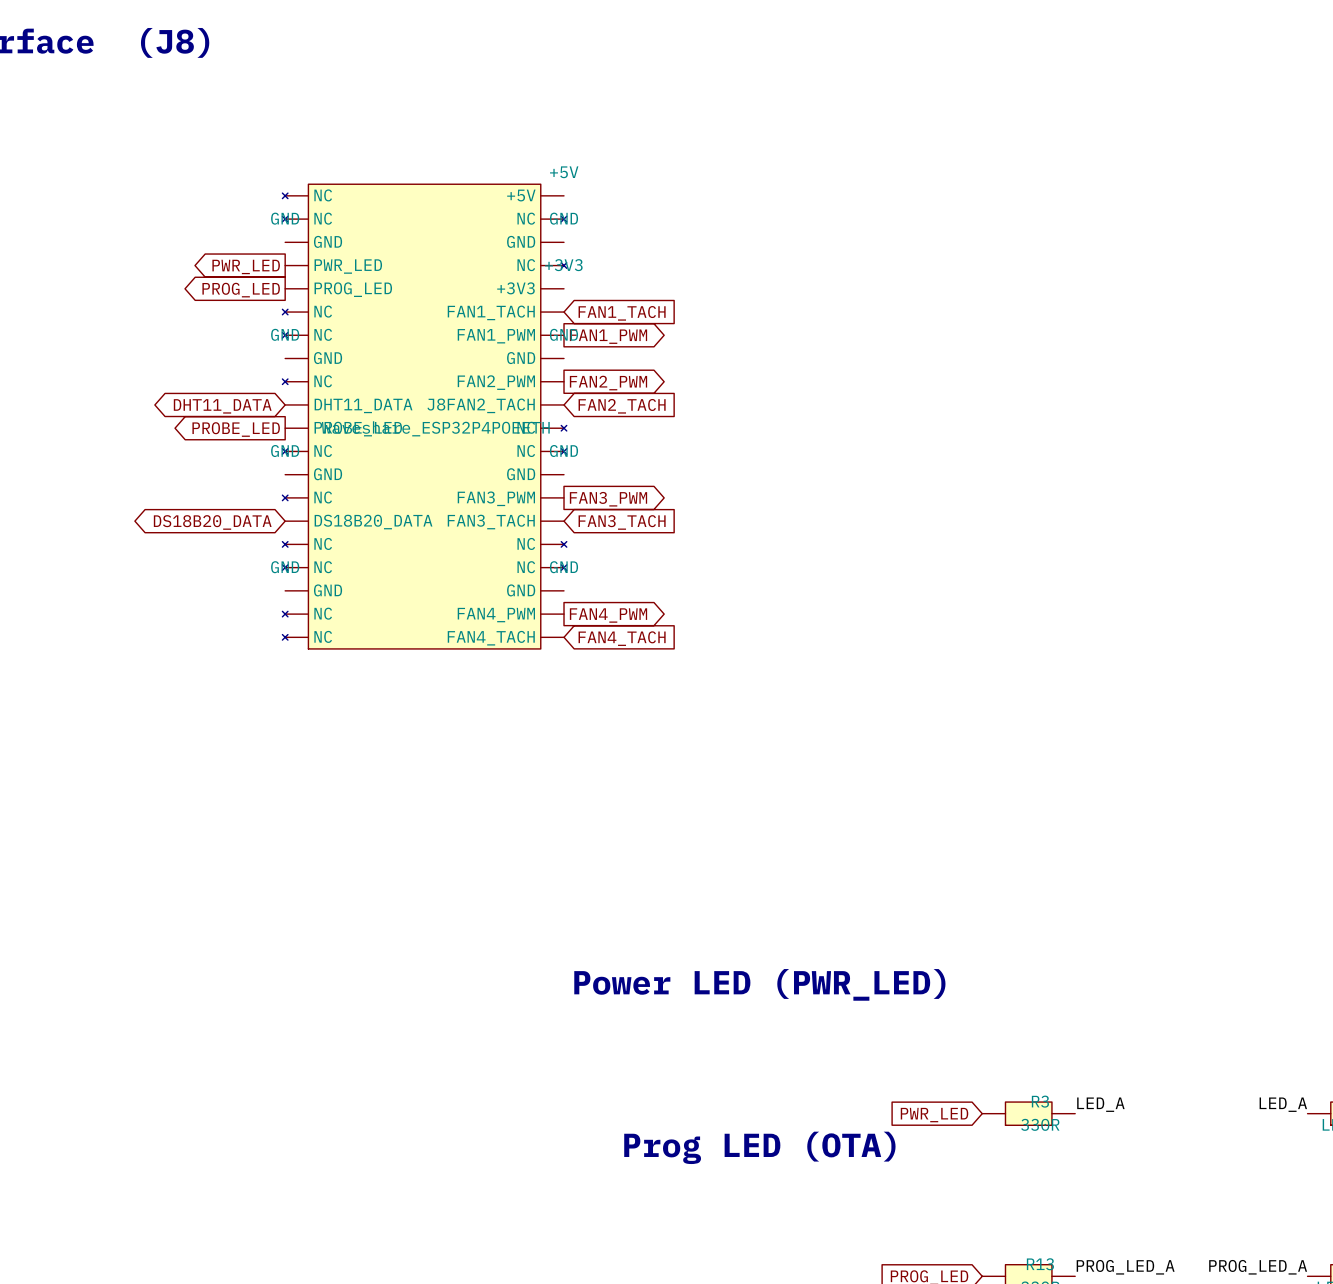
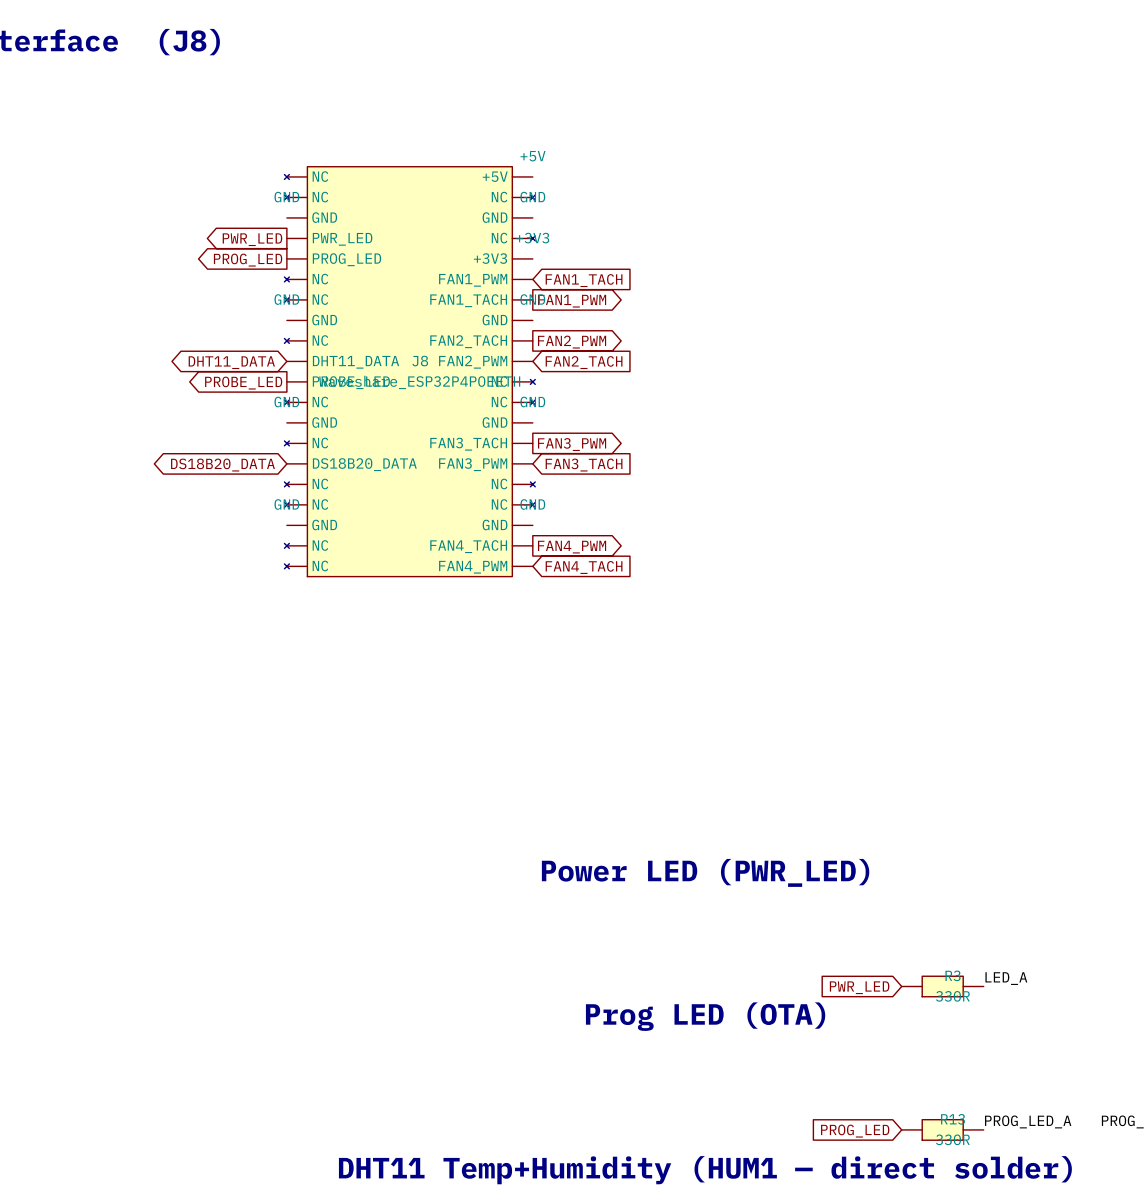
J8 pin name: FAN1_TACH (491, 312) -> FAN1_PWM (473, 280)
J8 pin name: FAN1_PWM (496, 336) -> FAN1_TACH (468, 300)
J8 pin name: FAN2_PWM (496, 382) -> FAN2_TACH (468, 341)
J8 pin name: FAN2_TACH (491, 405) -> FAN2_PWM (473, 362)
J8 pin name: FAN3_PWM (496, 498) -> FAN3_TACH (468, 444)
J8 pin name: FAN3_TACH (491, 522) -> FAN3_PWM (473, 464)
J8 pin name: FAN4_PWM (496, 615) -> FAN4_TACH (468, 546)
J8 pin name: FAN4_TACH (491, 638) -> FAN4_PWM (473, 567)

